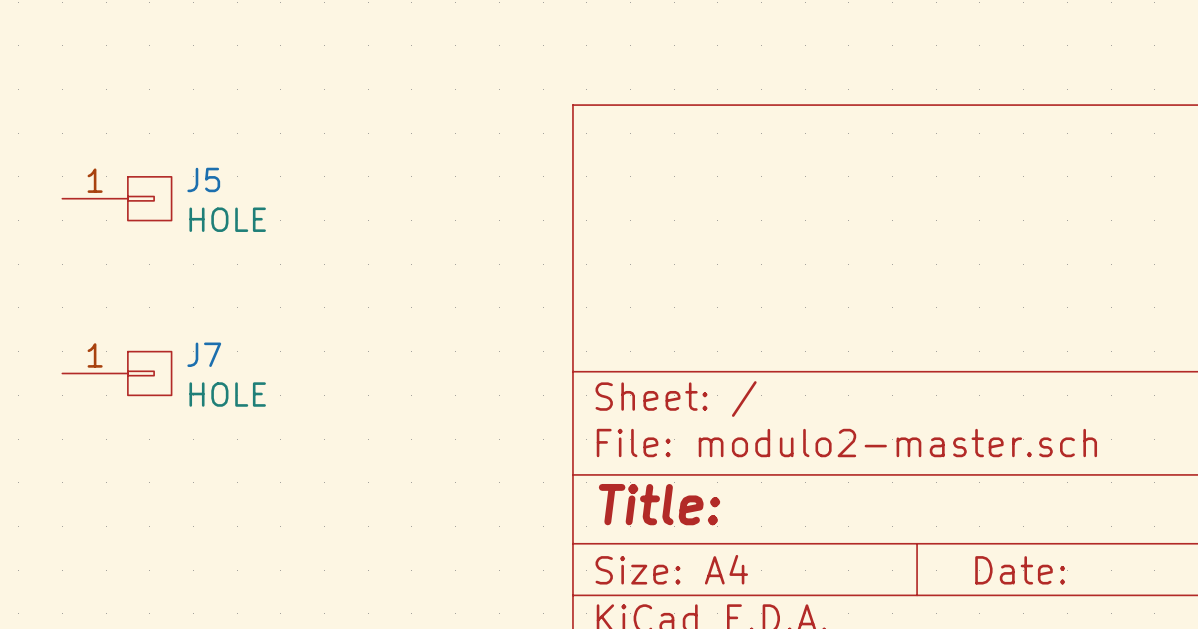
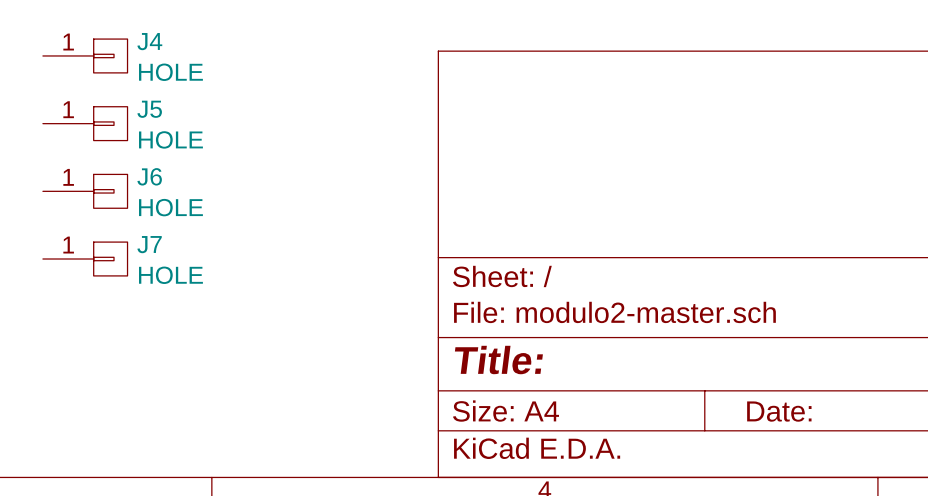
J4: none -> HOLE (85, 55)
J6: none -> HOLE (85, 191)

